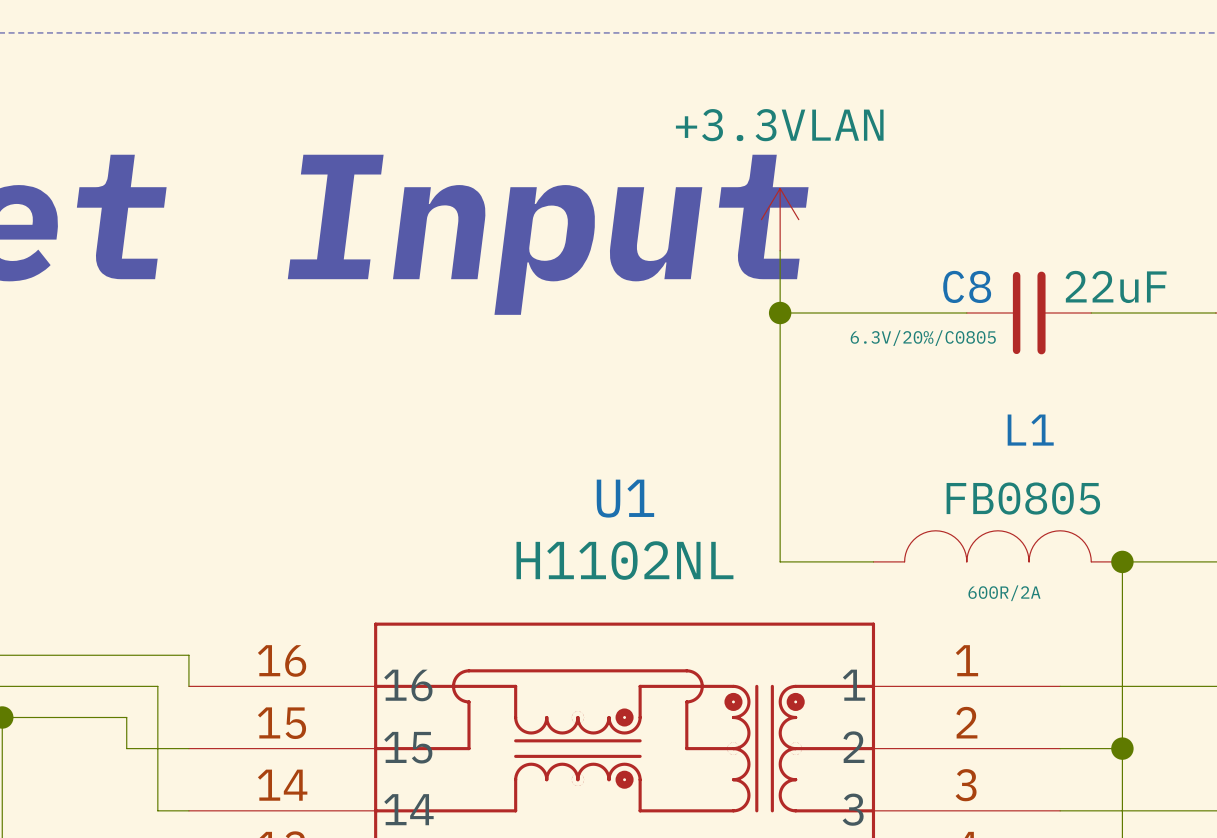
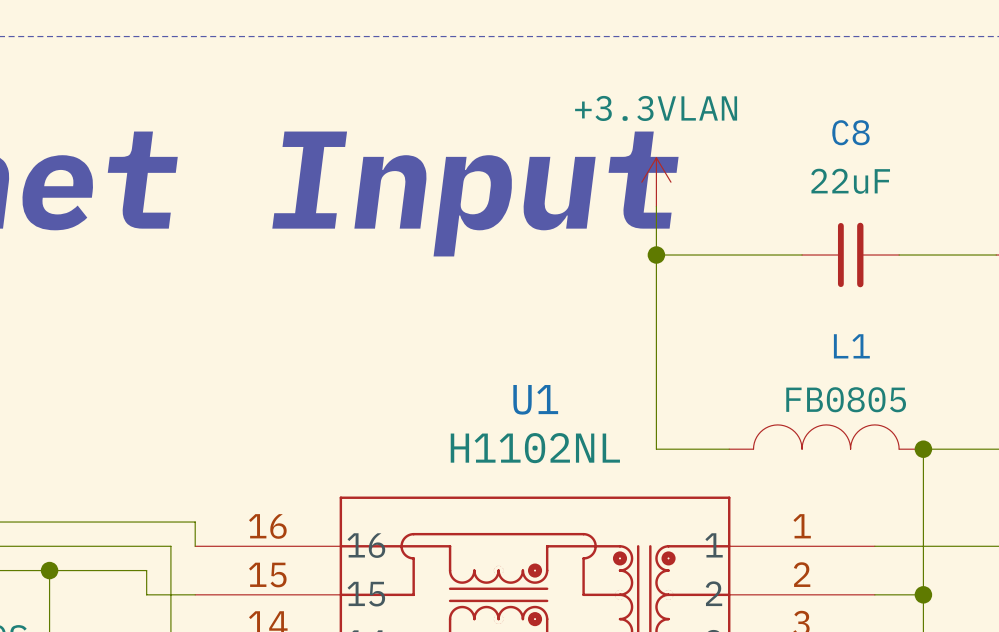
C8 name position: C8 (967, 286) -> C8 (850, 132)
C8 value position: 22uF (1116, 286) -> 22uF (850, 181)
C8 text: 6.3V/20%/C0805 (923, 338) -> none
L1 text: 600R/2A (1004, 593) -> none

